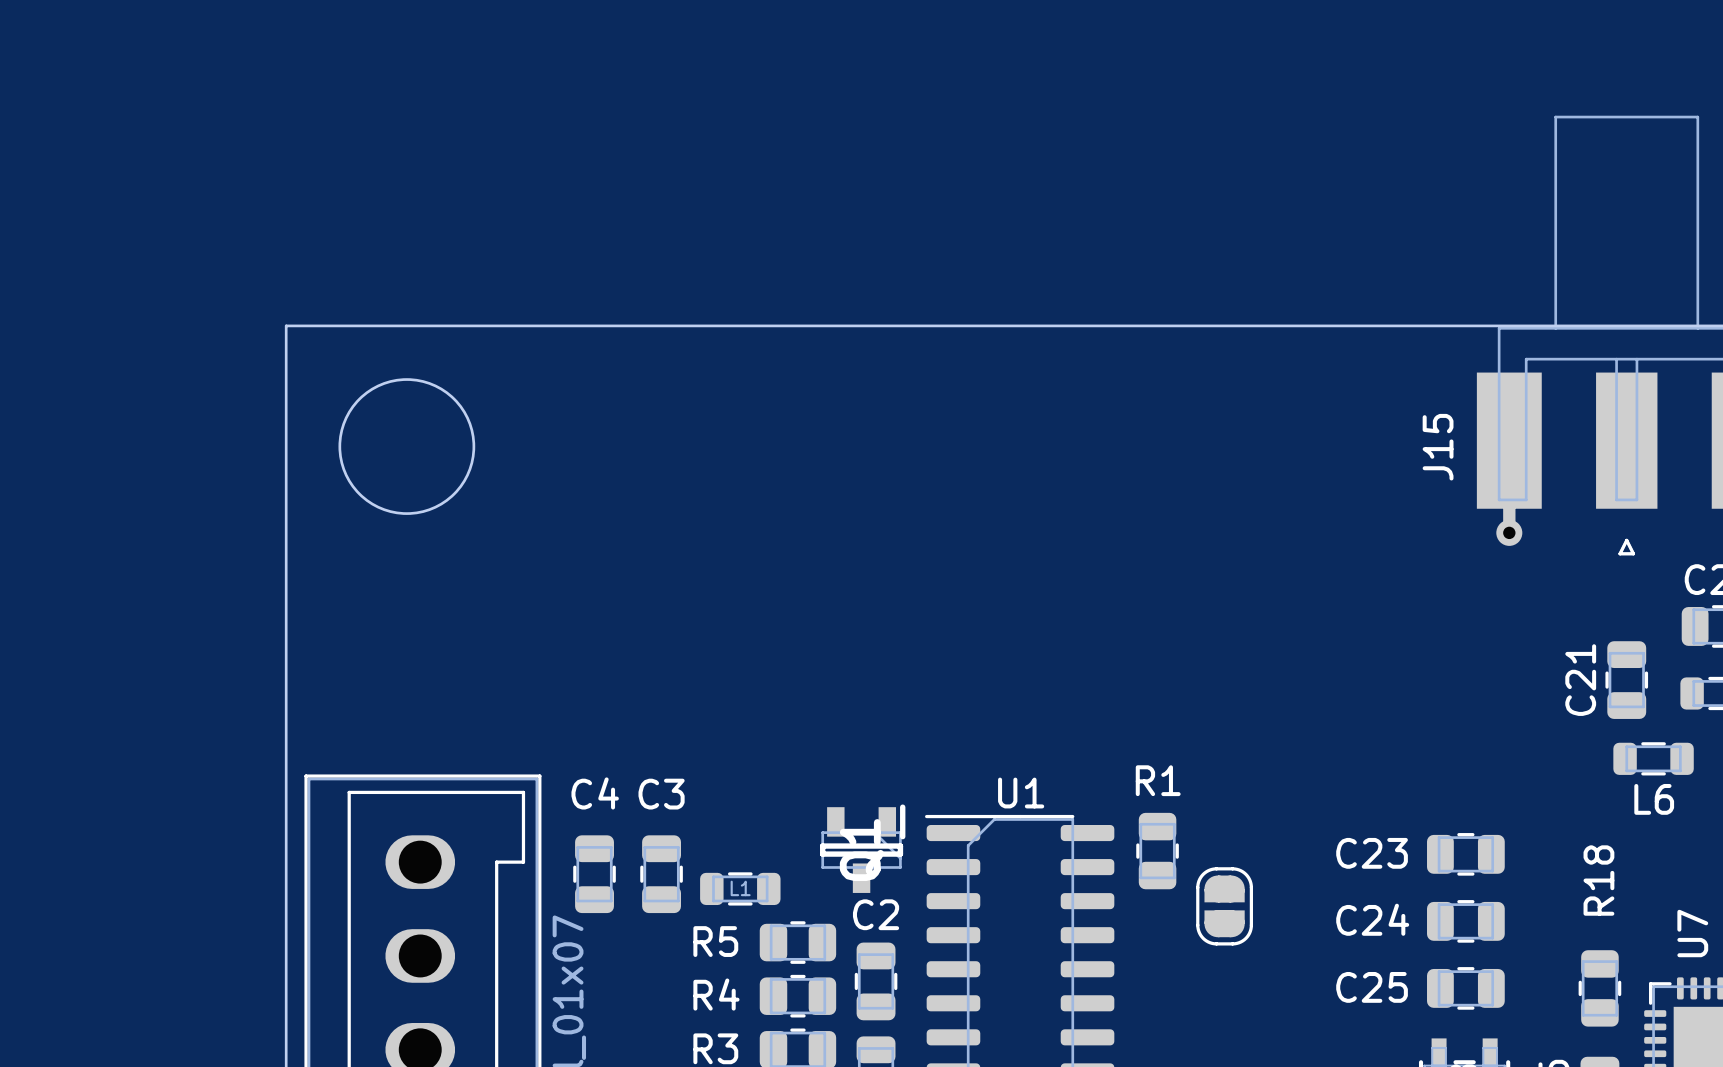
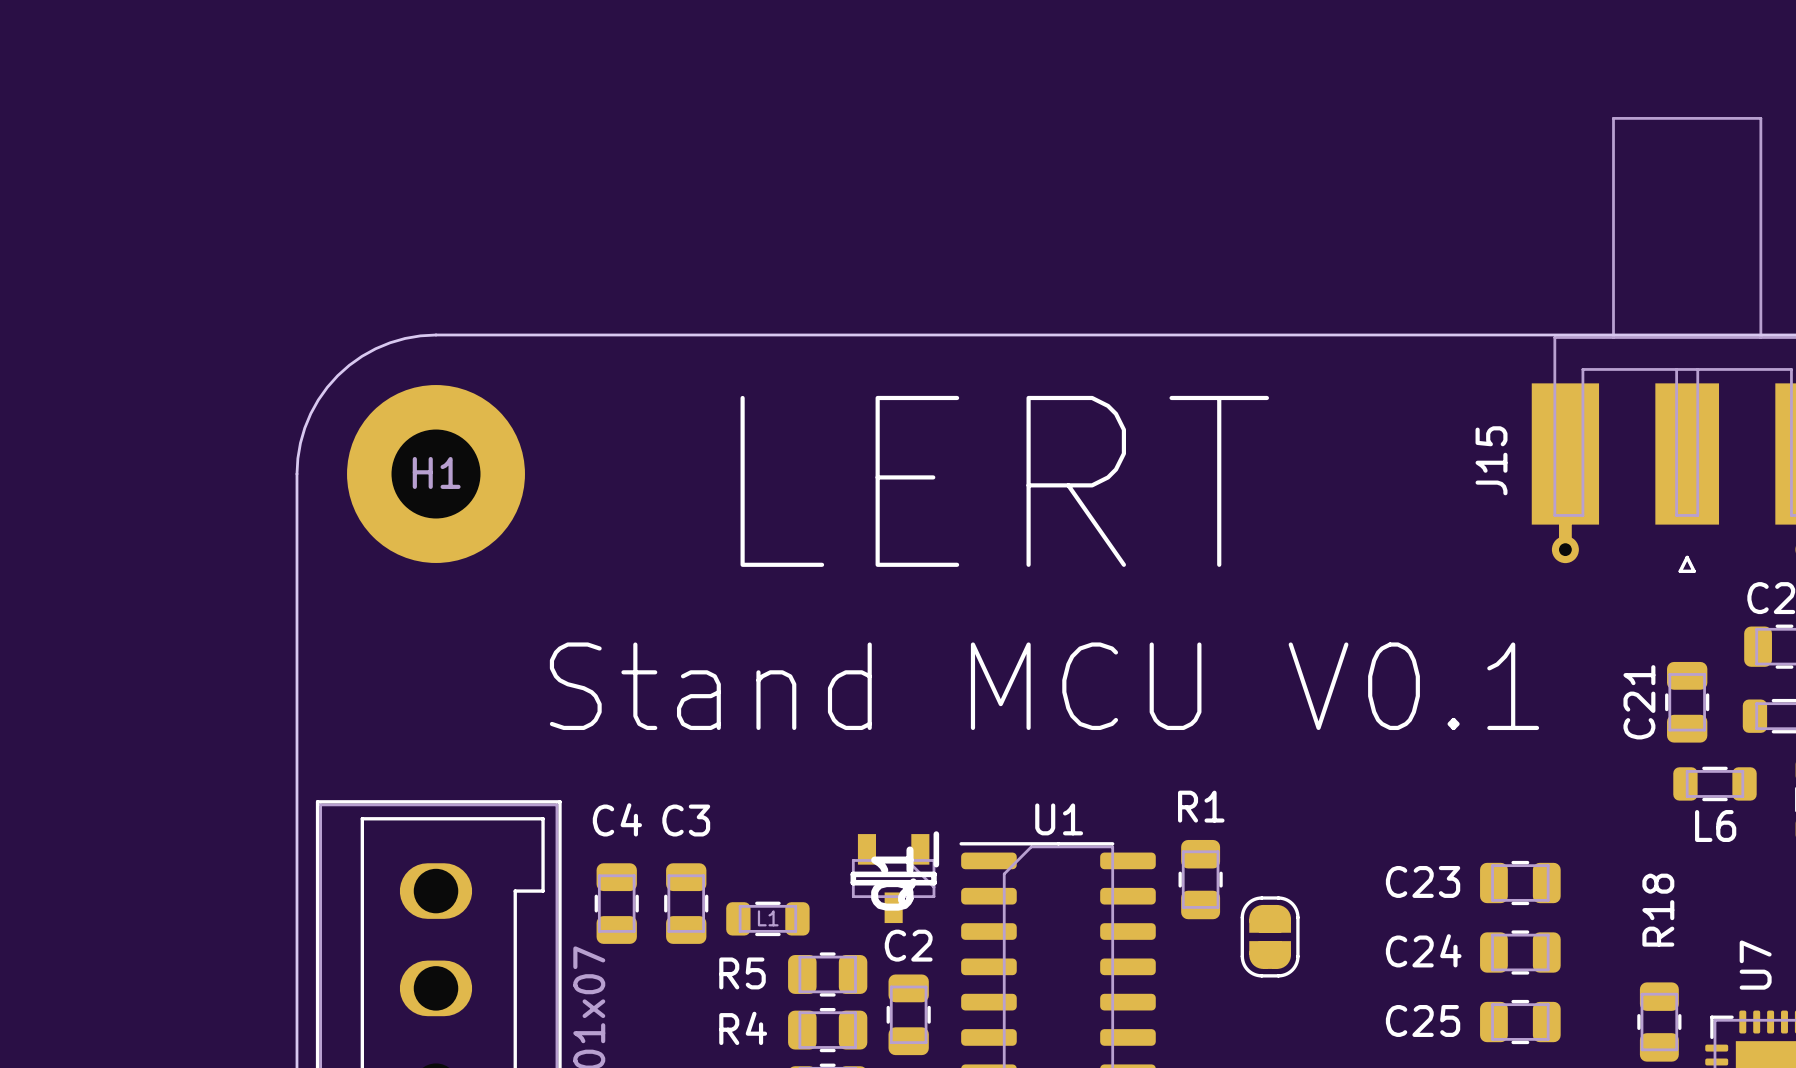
board edge: (420, 325) (286, 325) (286, 459) -> (436, 334) (405, 338) (375, 348) (362, 356) (337, 375) (318, 400) (304, 428) (297, 458) (296, 474)
round board edge: [338, 378, 476, 515] -> none
H1: none -> (436, 474)
text: none -> LERT (1004, 481)
text: none -> Stand MCU V0.1 (1044, 686)

